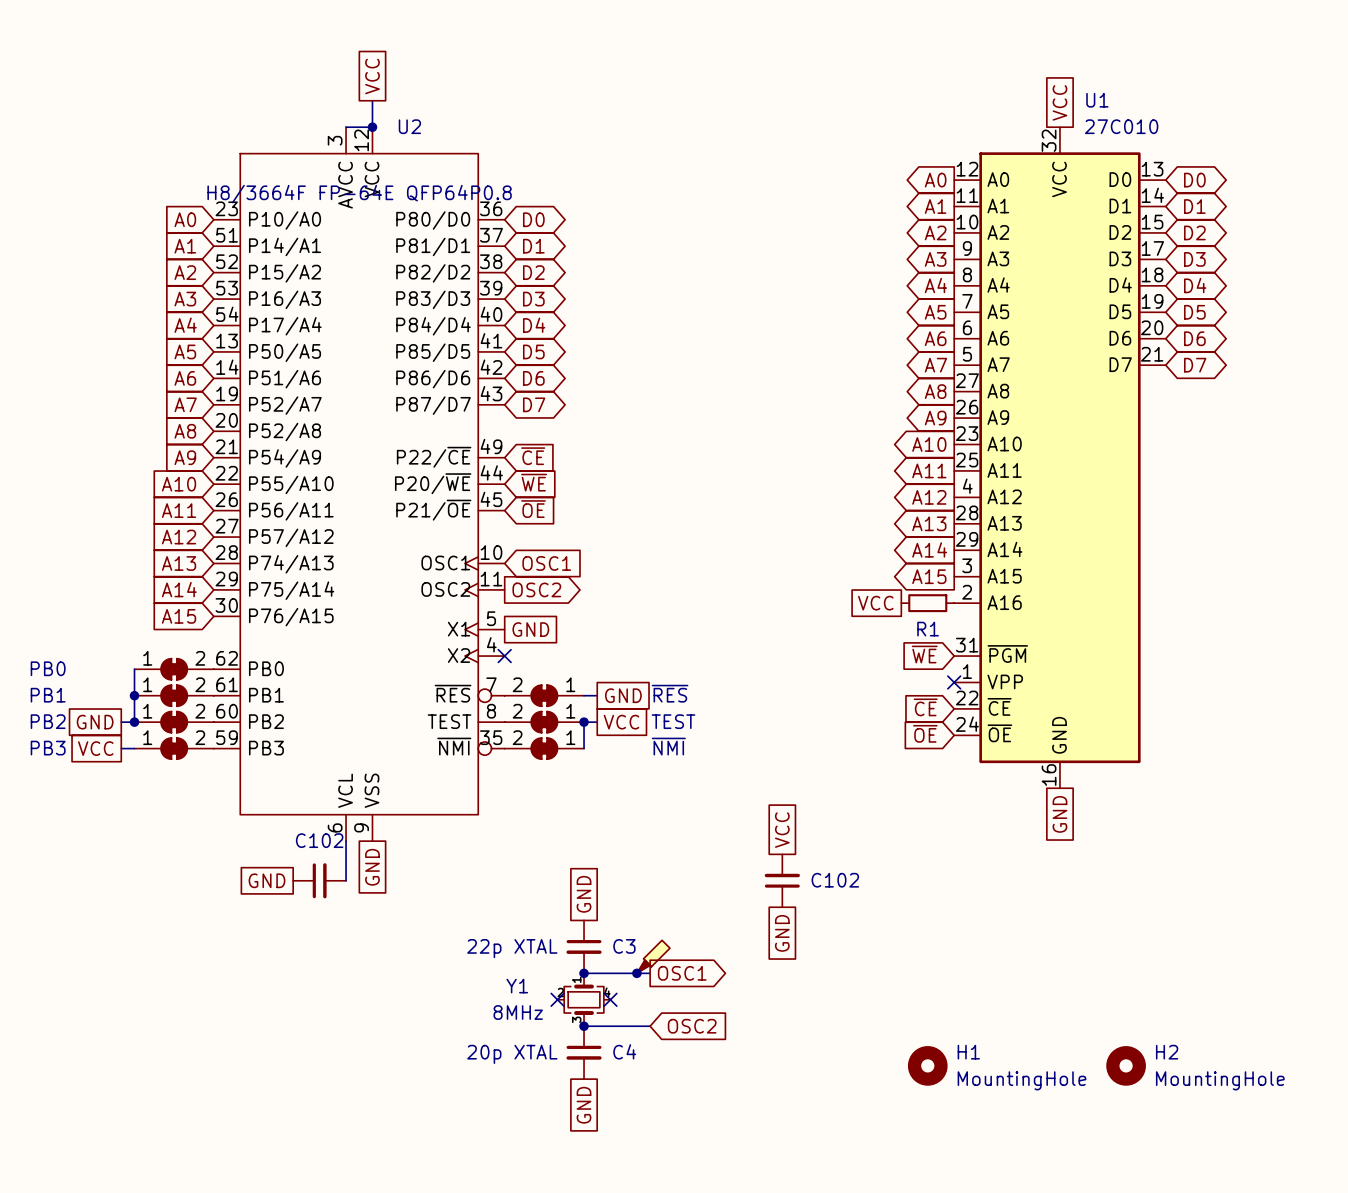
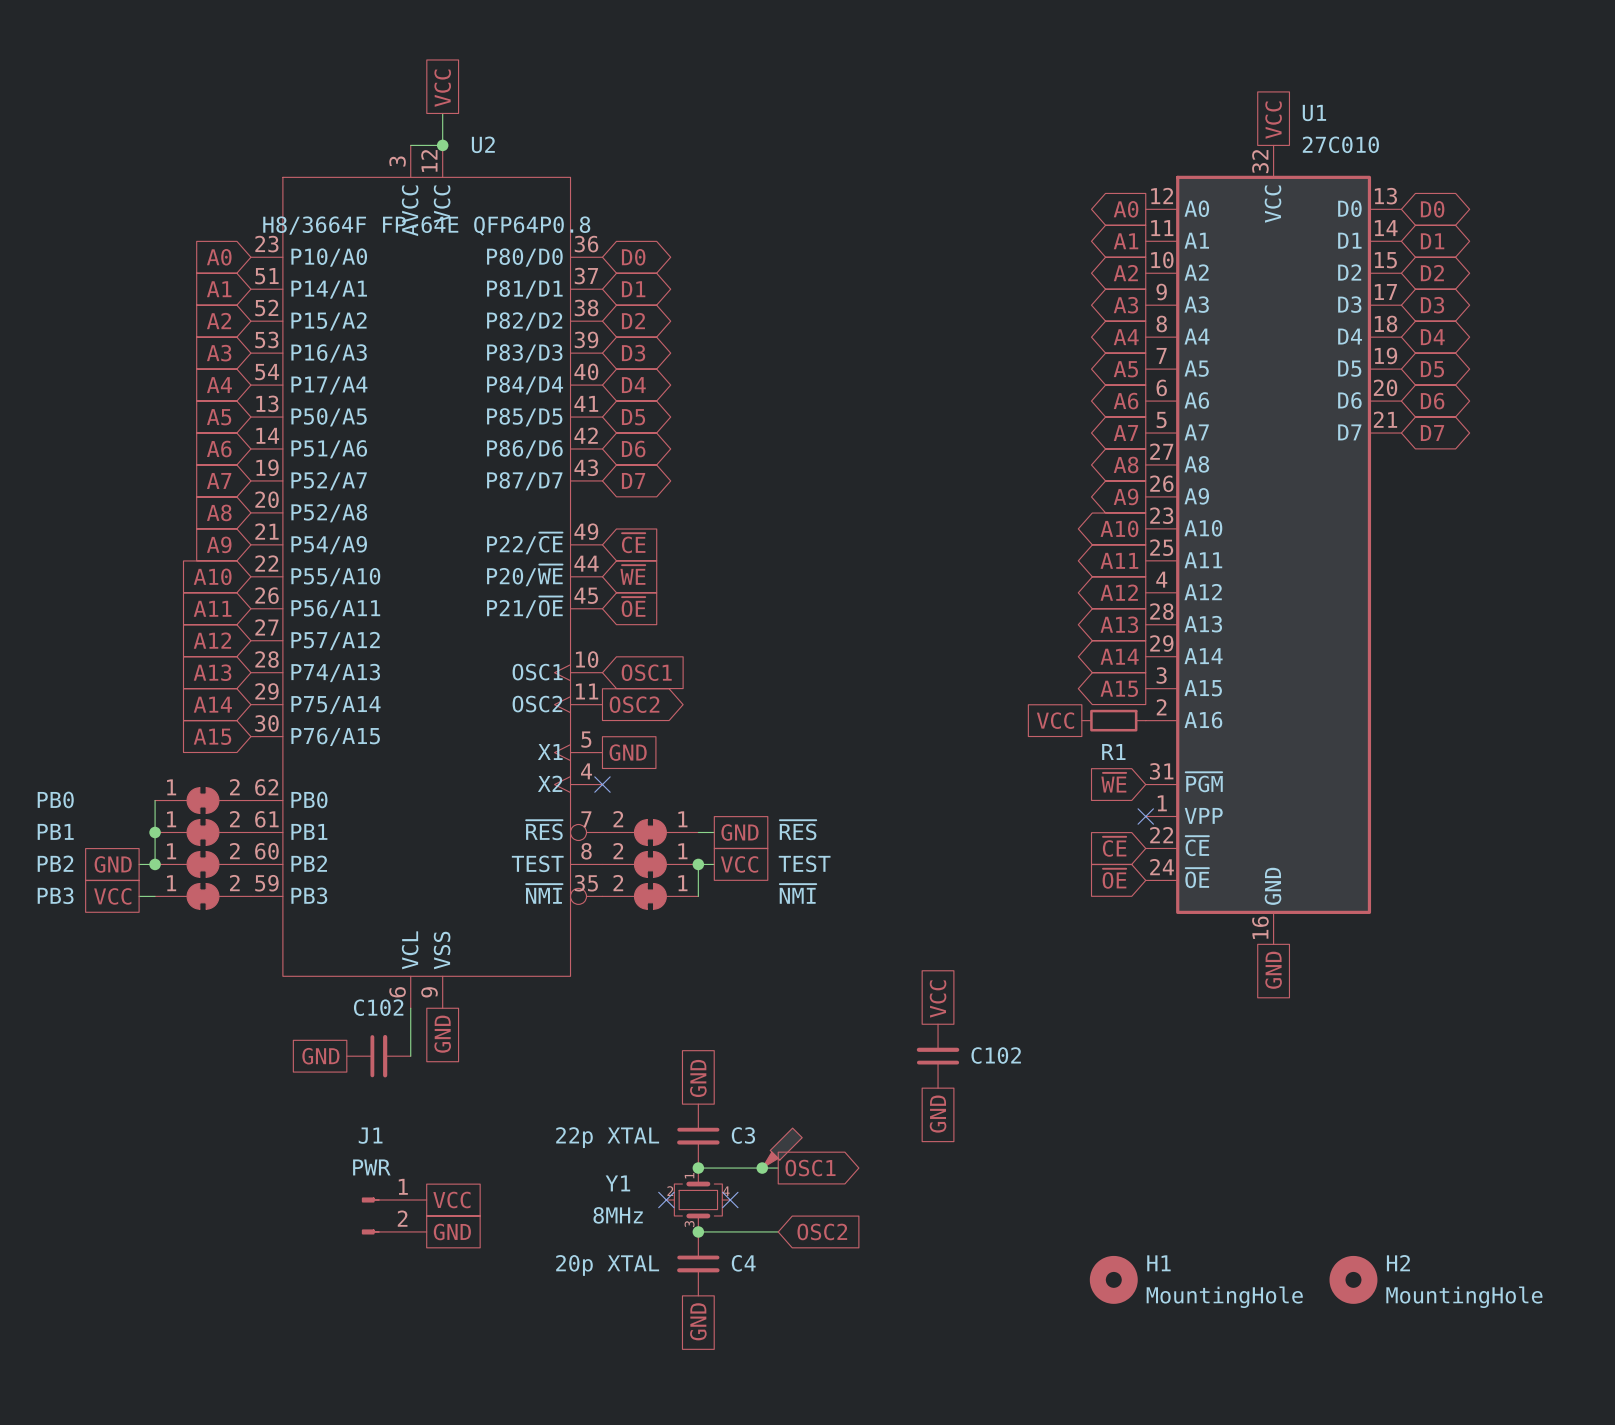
global label: none -> VCC (451, 1200)
J1: none -> PWR (394, 1215)
global label: none -> GND (452, 1231)

